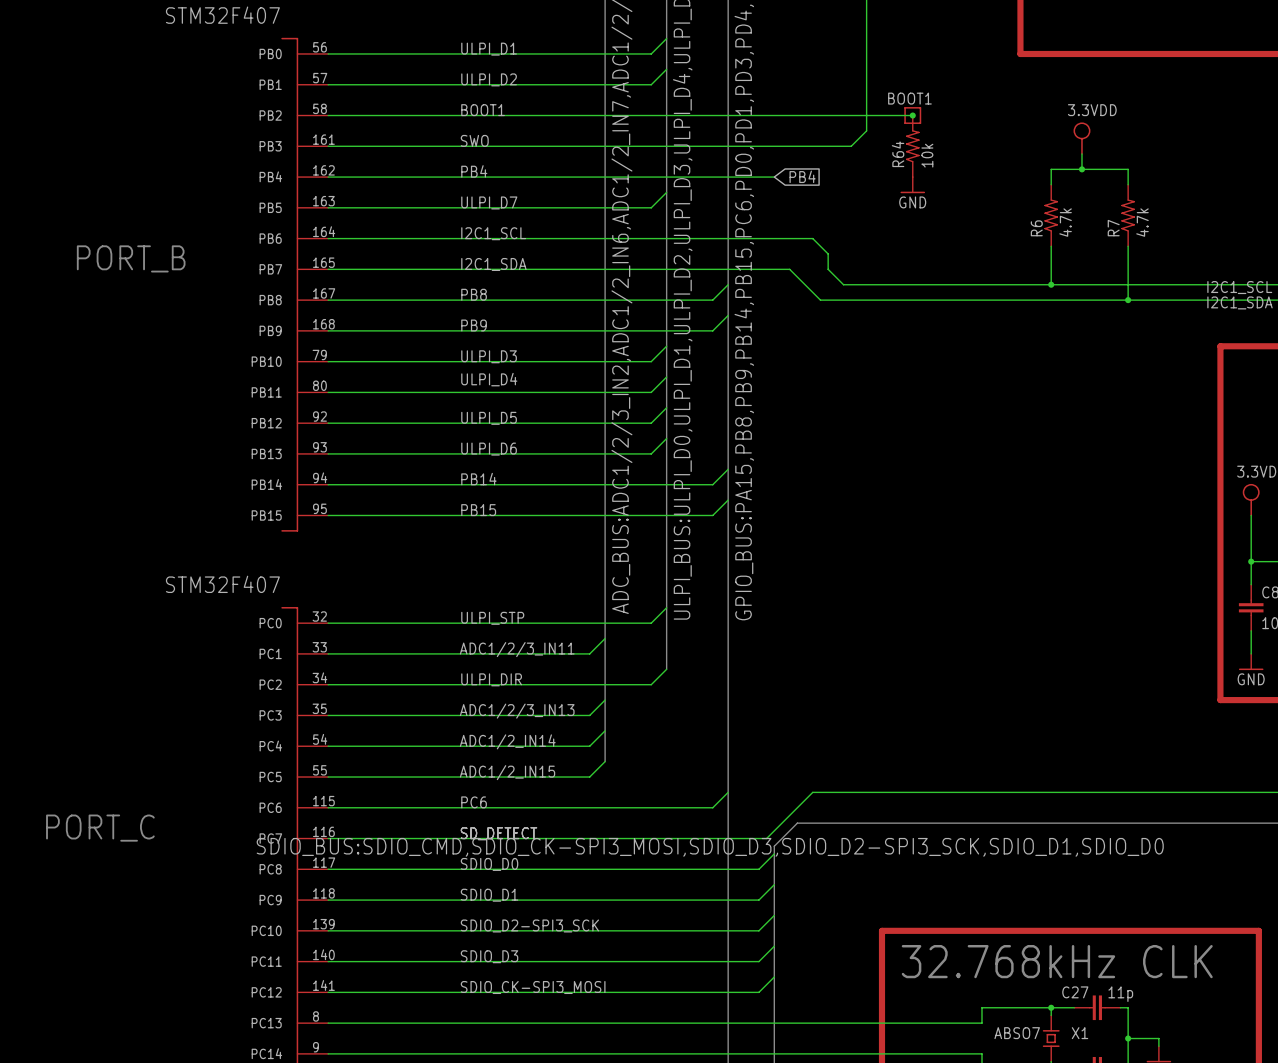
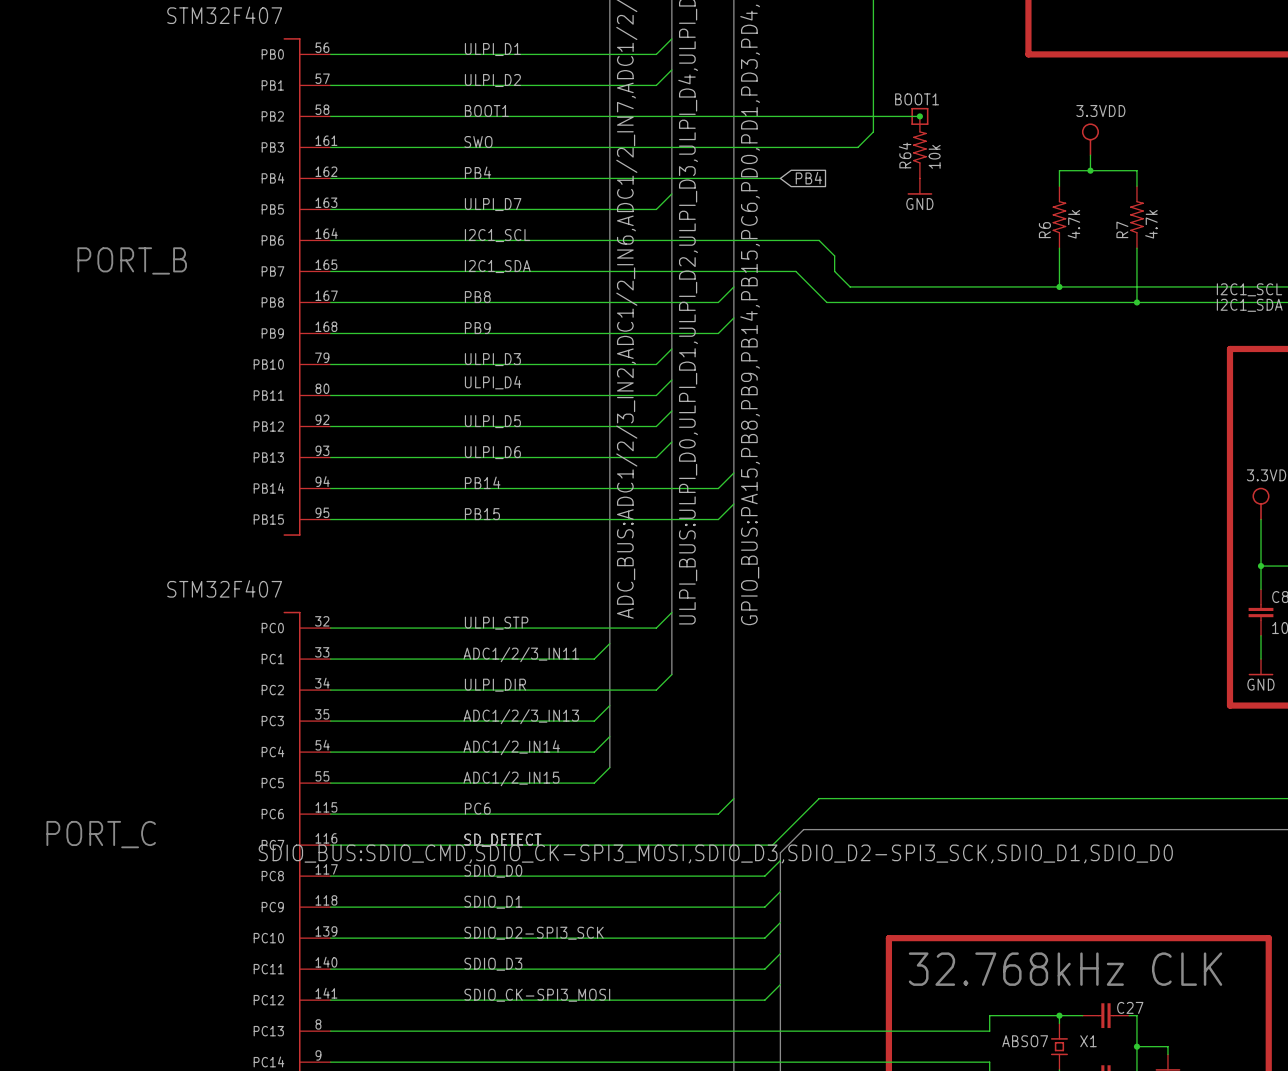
C27 name position: C27 (1075, 992) -> C27 (1130, 1007)
C27 value: 11p (1120, 994) -> none

